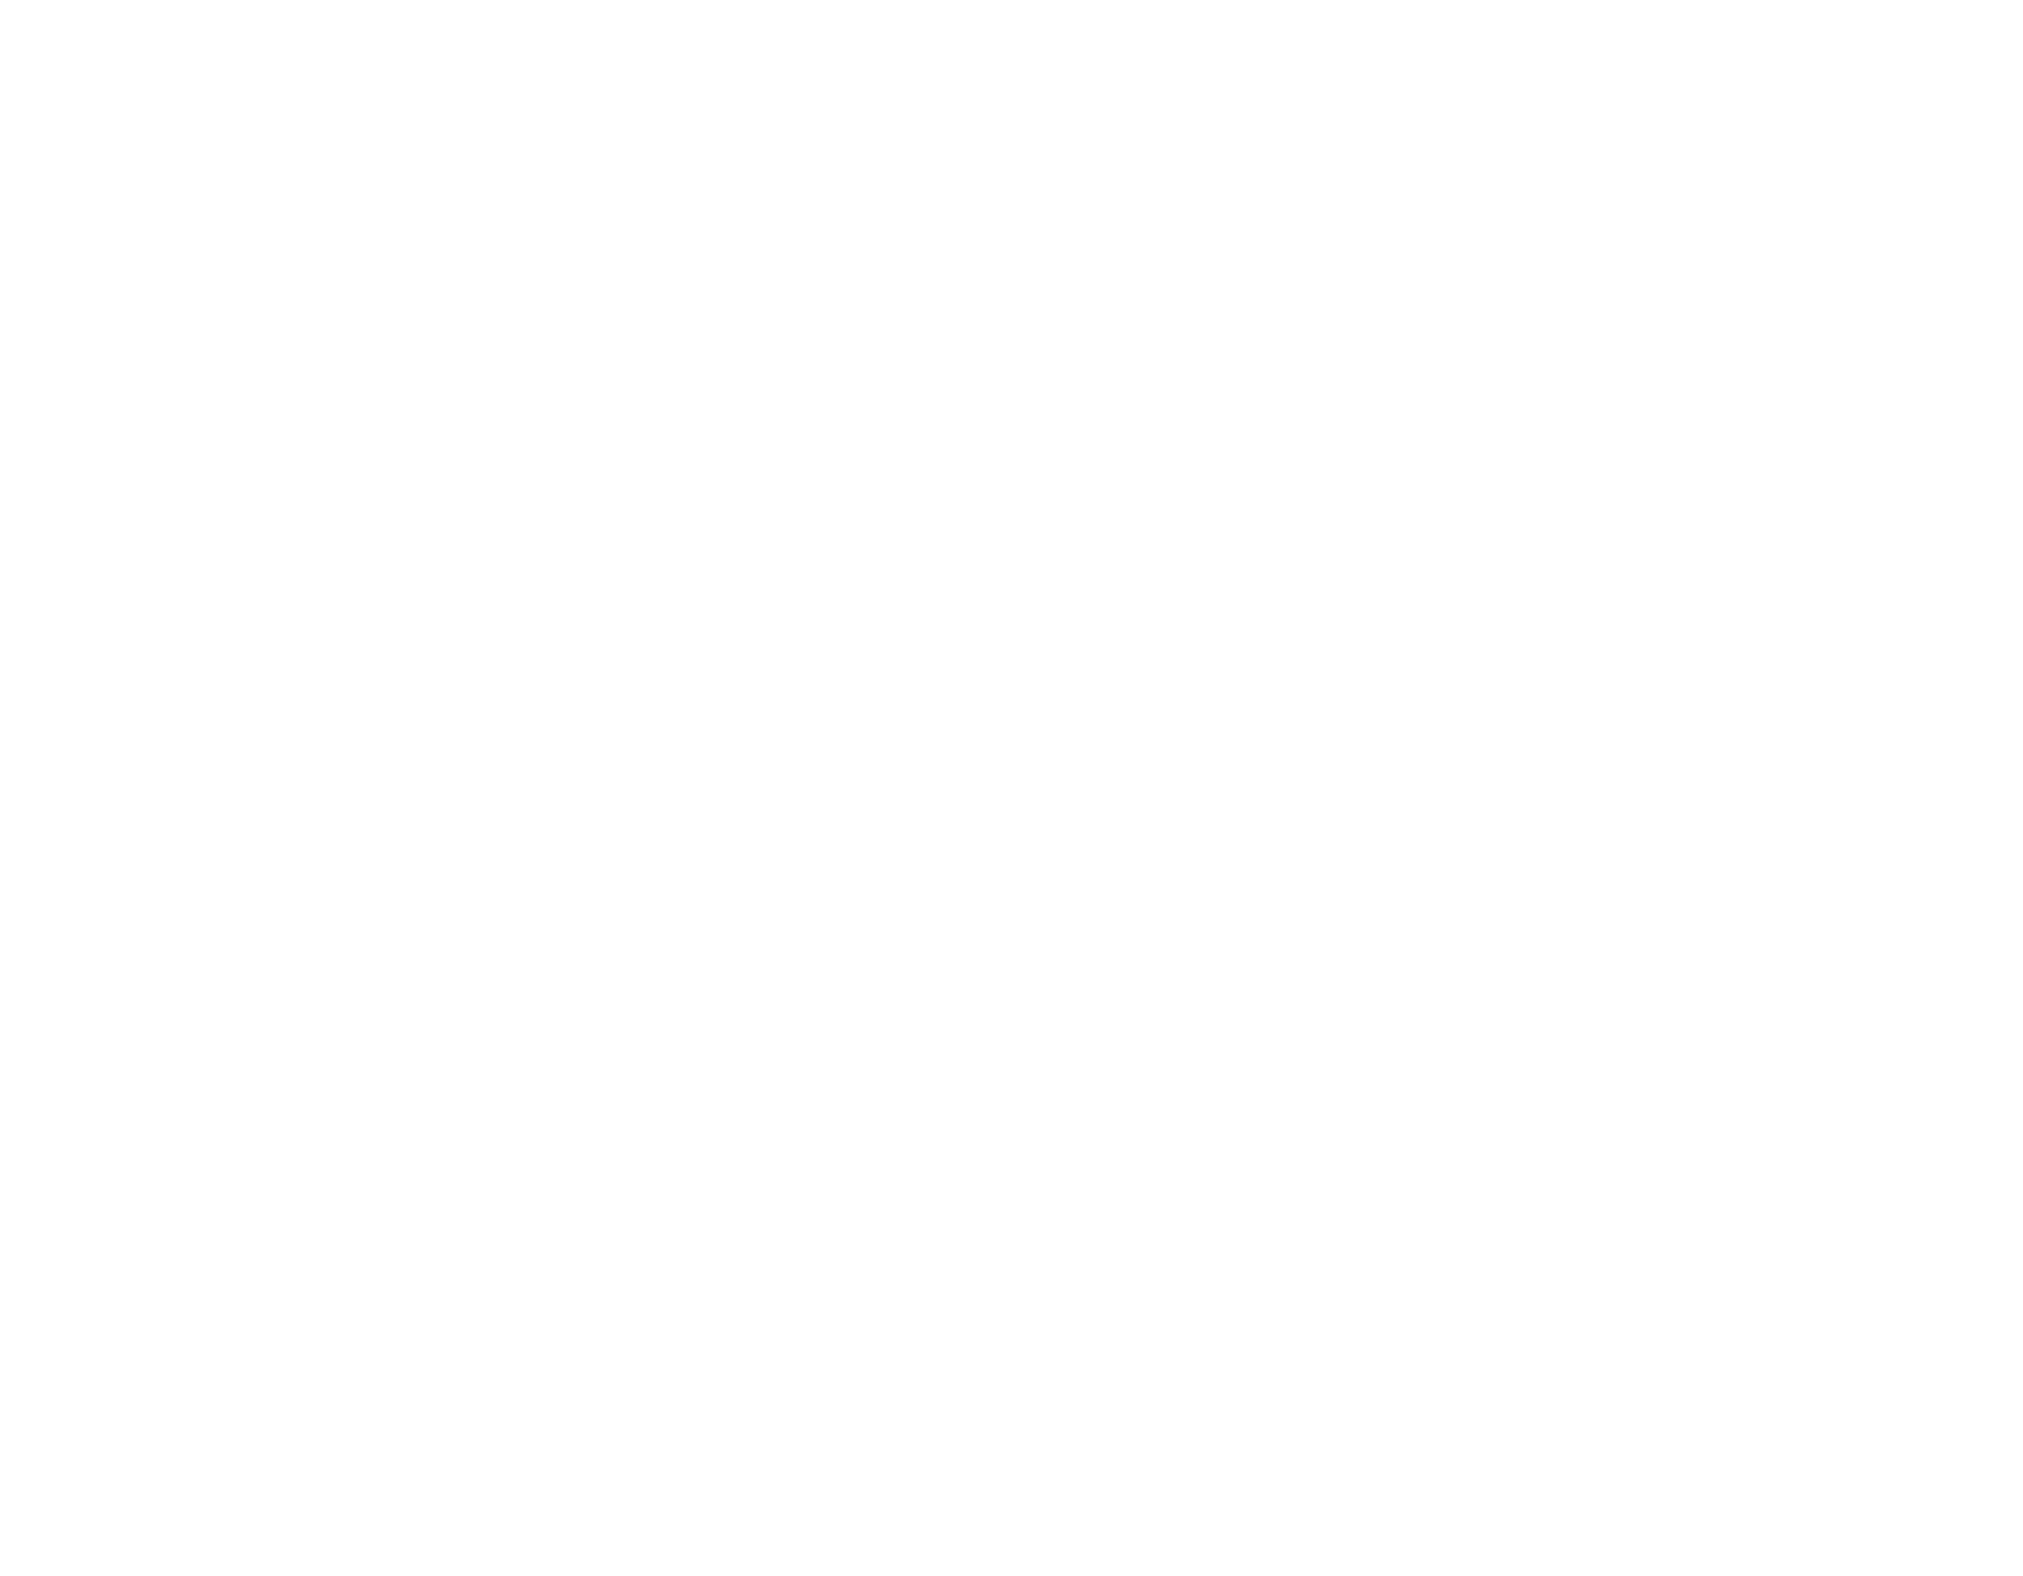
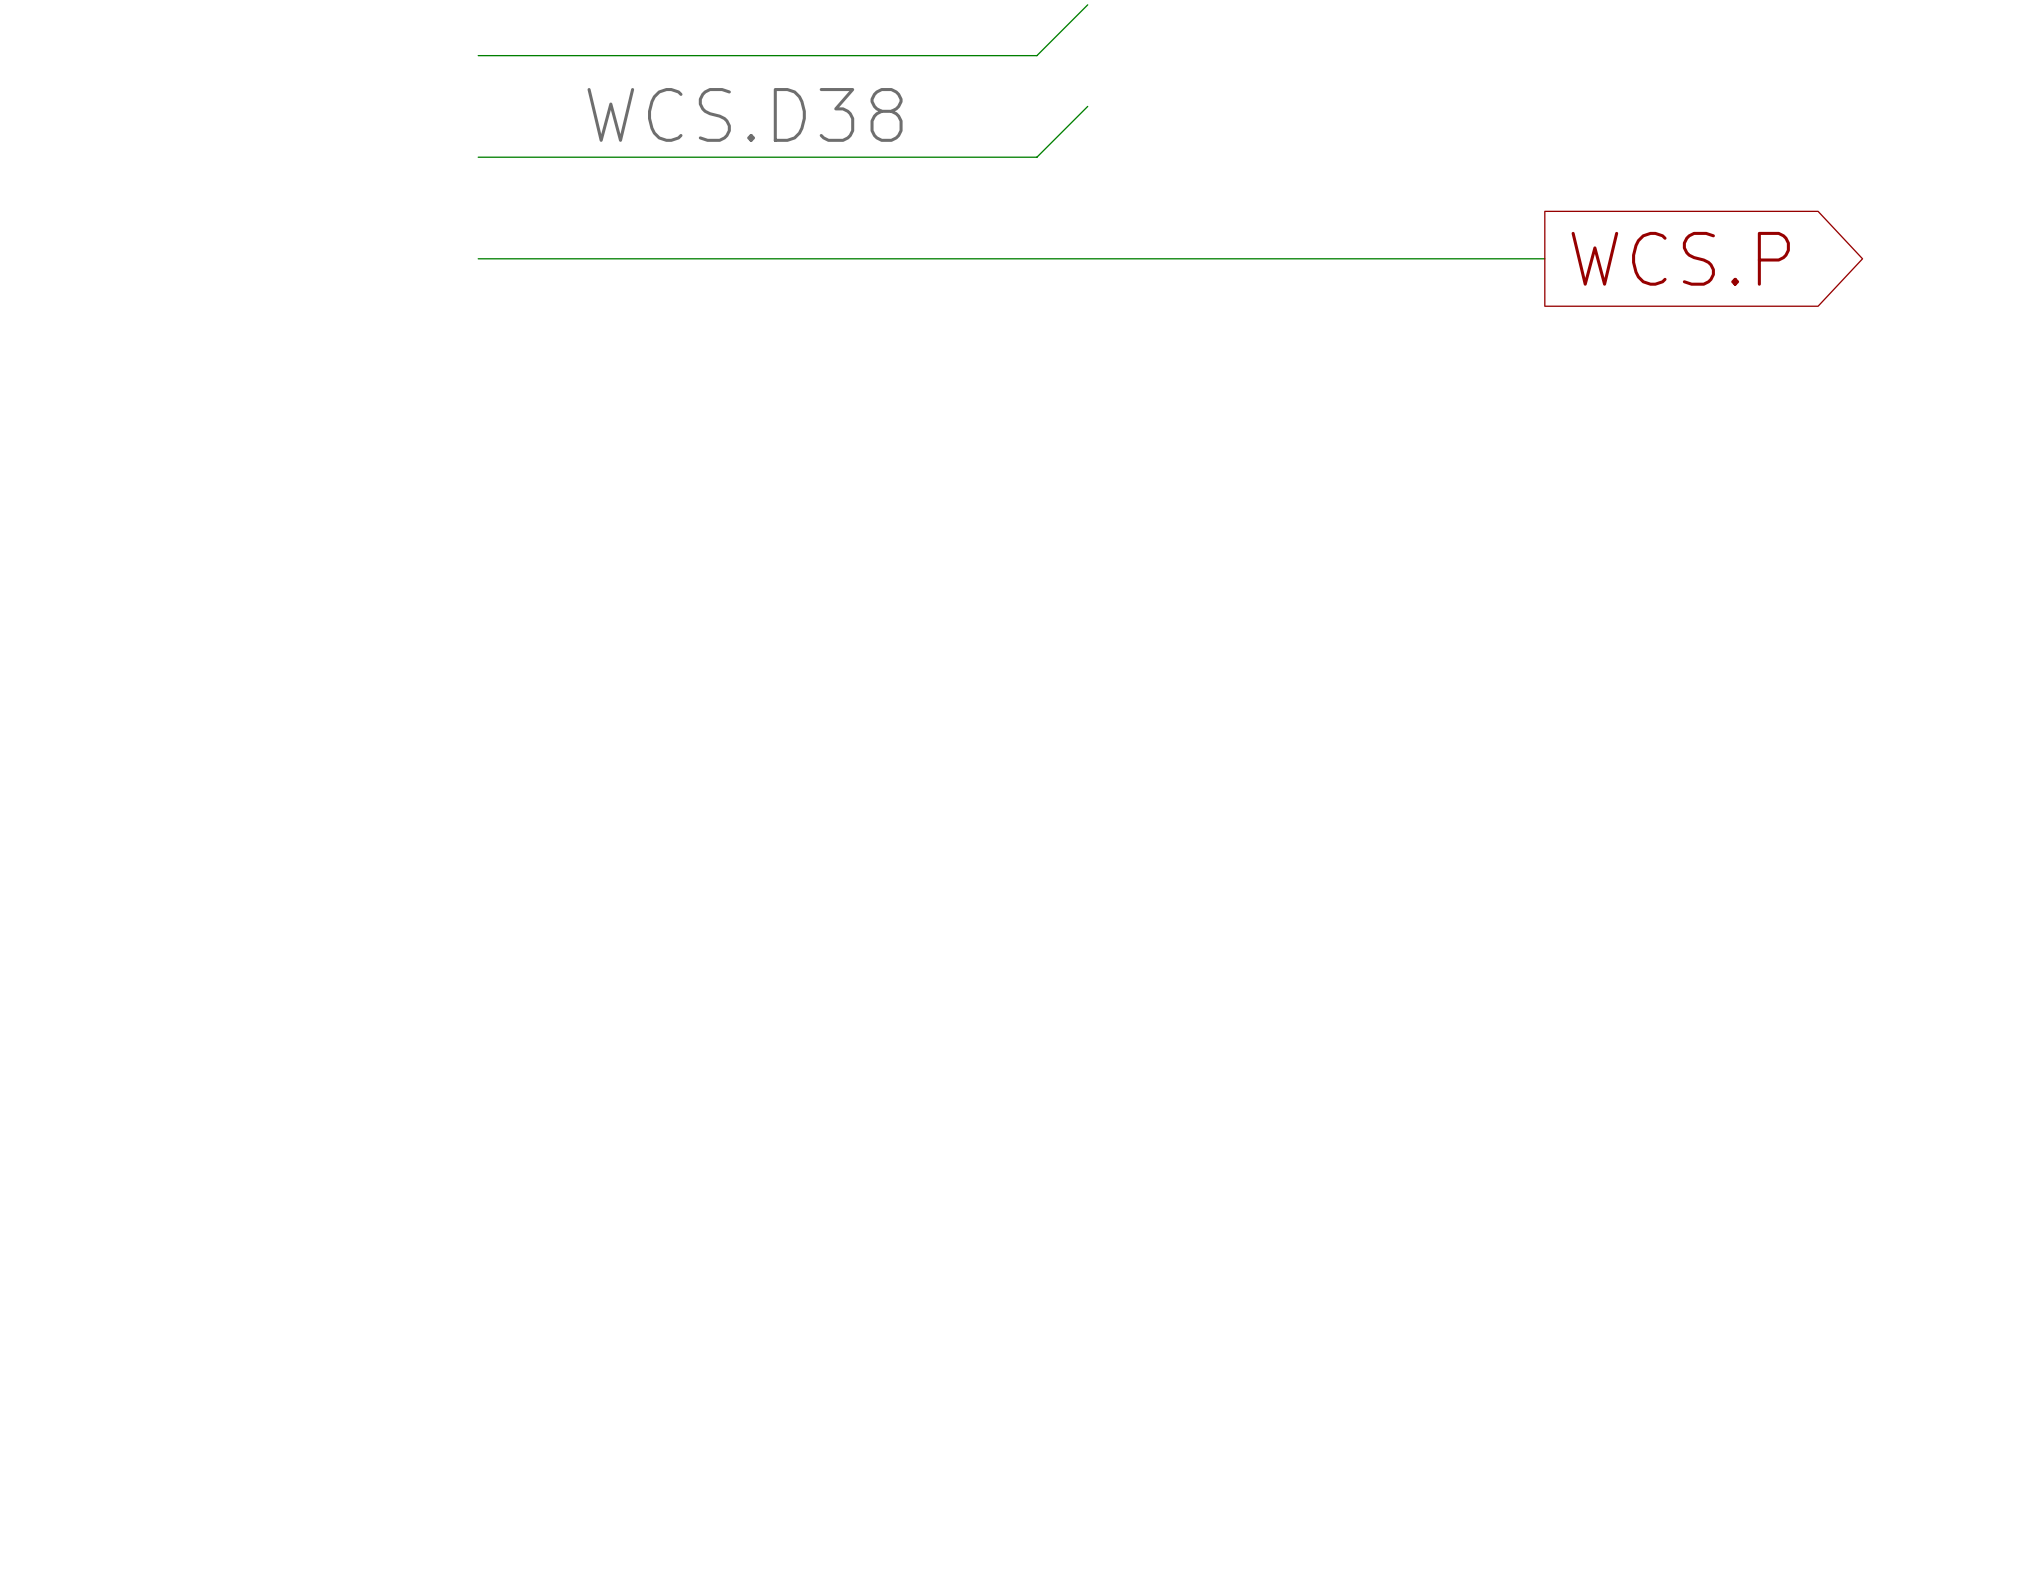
wire: none -> (1087, 4) (1036, 55) (478, 55)
wire: none -> (1087, 106) (1036, 157) (478, 157)
label: none -> WCS.D38 (745, 114)
wire: none -> (478, 258) (1544, 258)
global label: none -> WCS.P (1680, 258)

